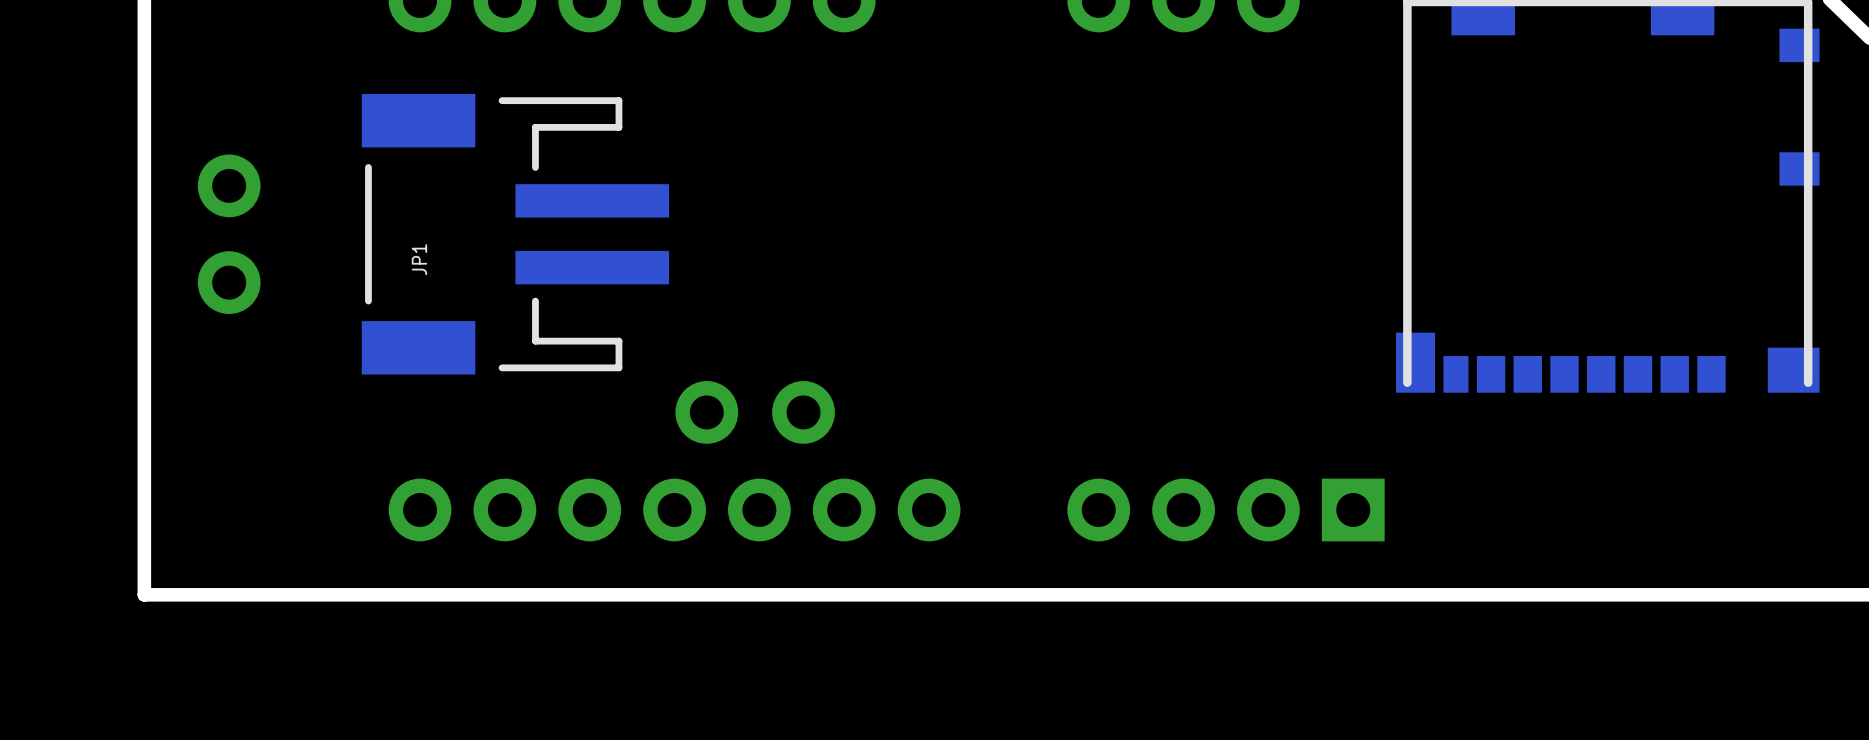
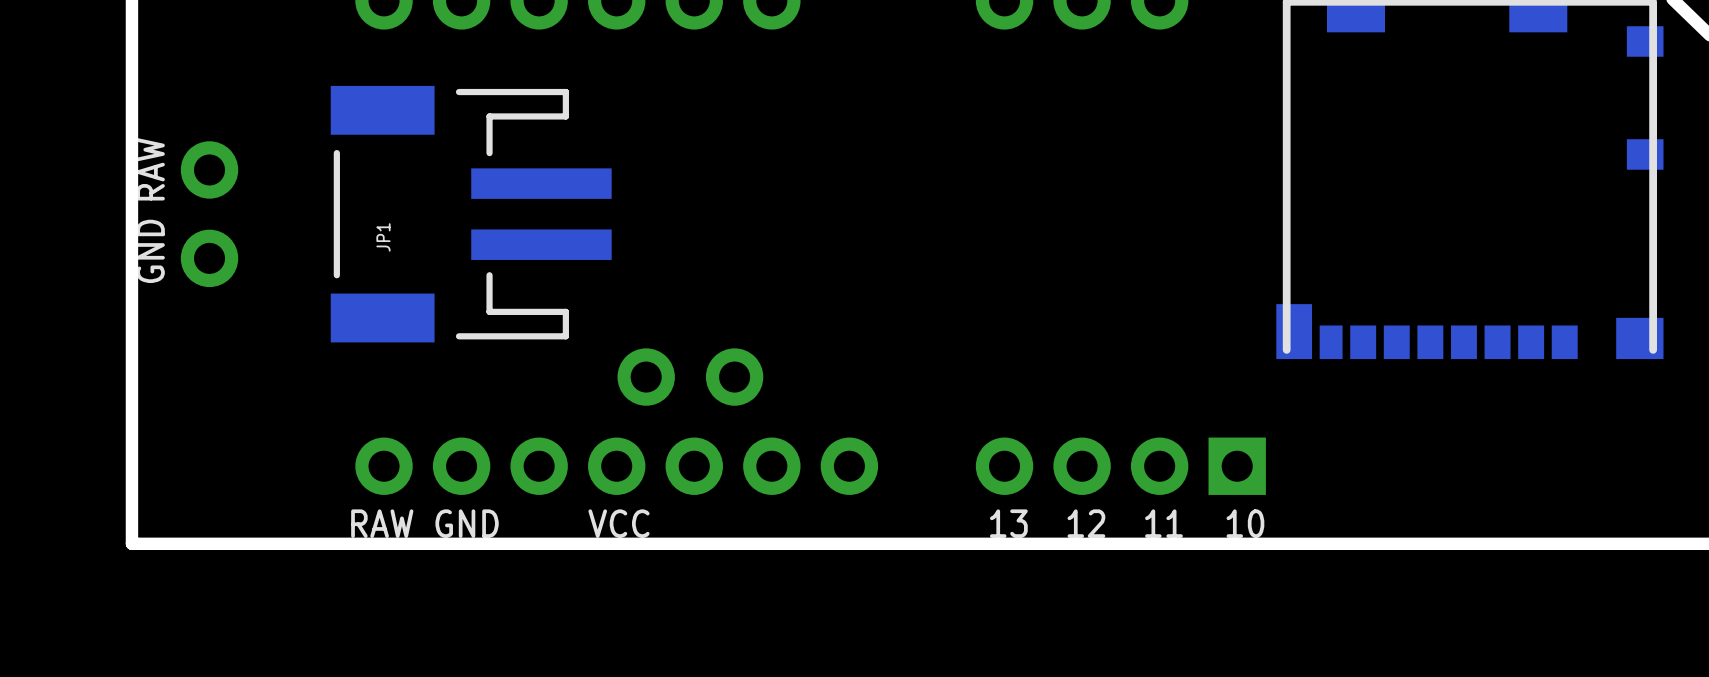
text: none -> RAW (150, 169)
text: none -> GND (150, 251)
text: none -> RAW (382, 523)
text: none -> GND (467, 523)
text: none -> VCC (618, 523)
text: none -> 13 (1008, 523)
text: none -> 12 (1086, 523)
text: none -> 11 (1163, 523)
text: none -> 10 (1245, 523)

